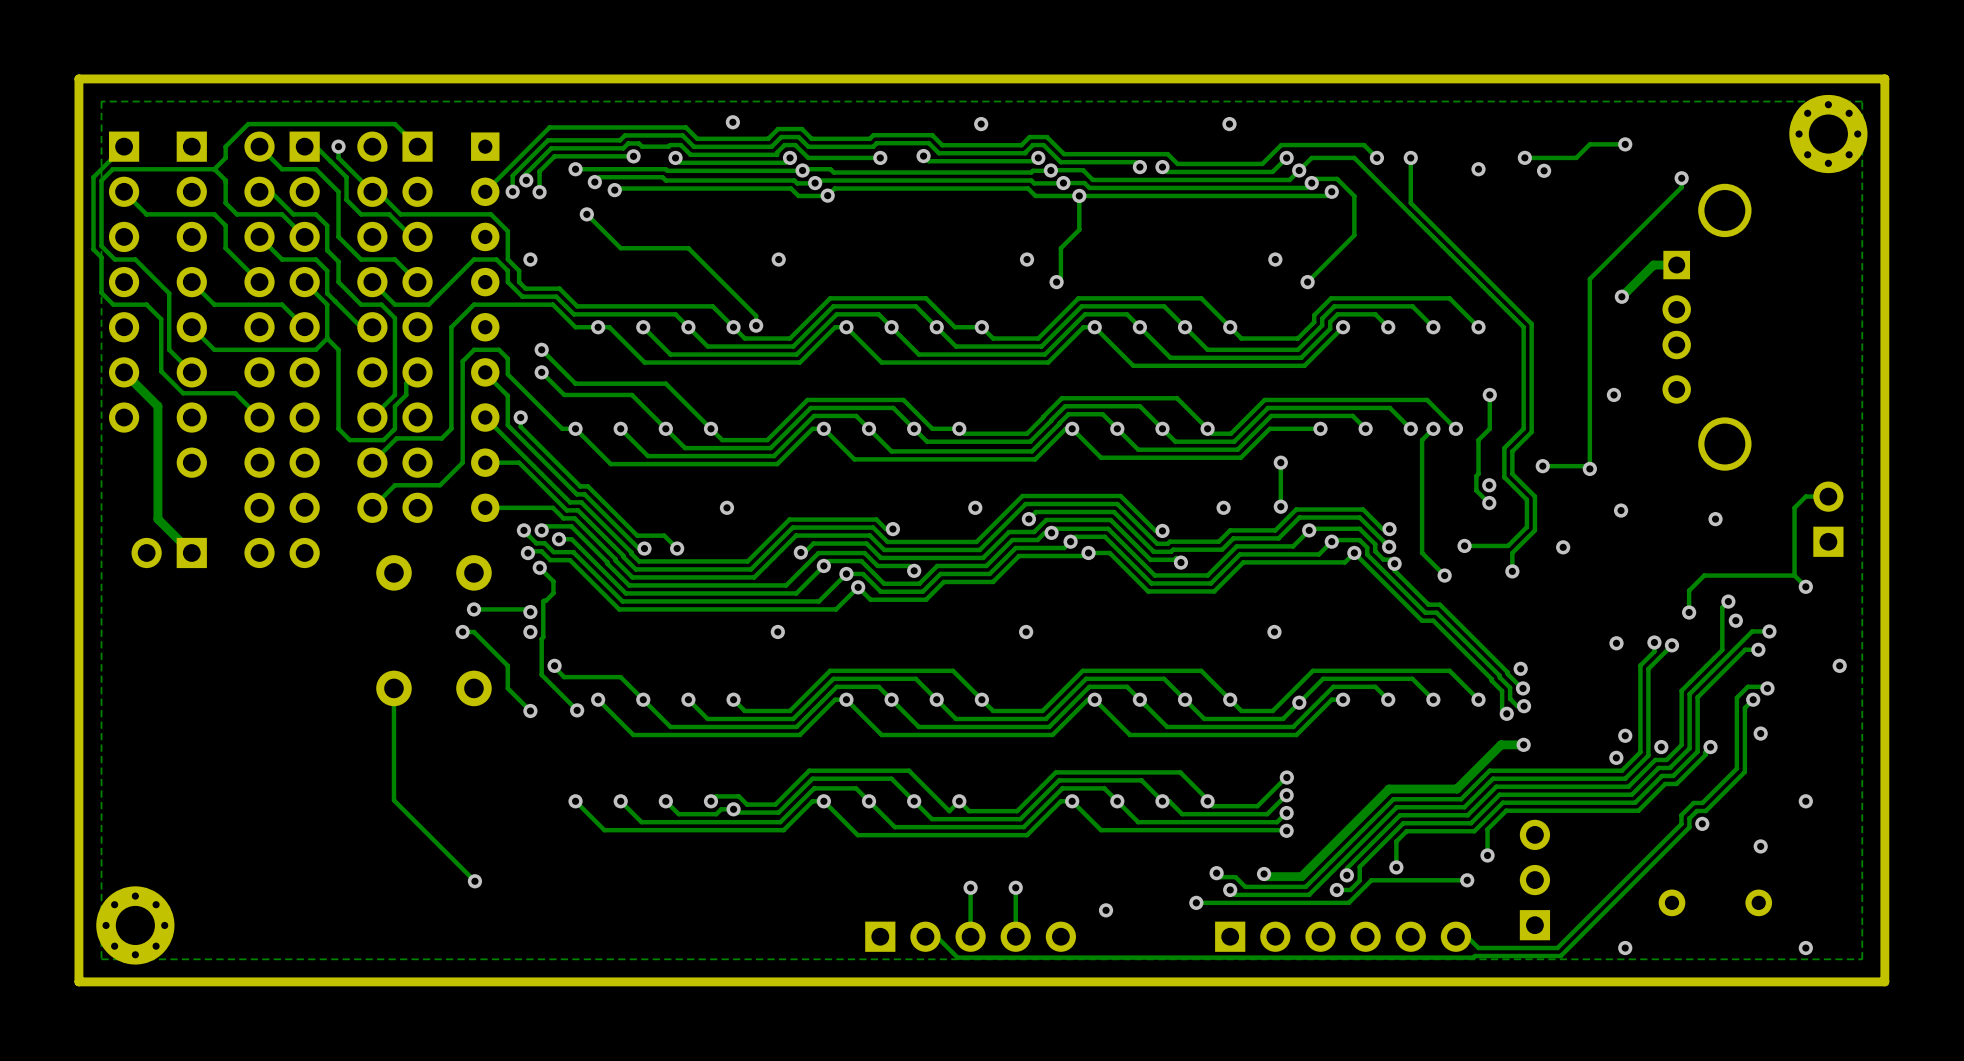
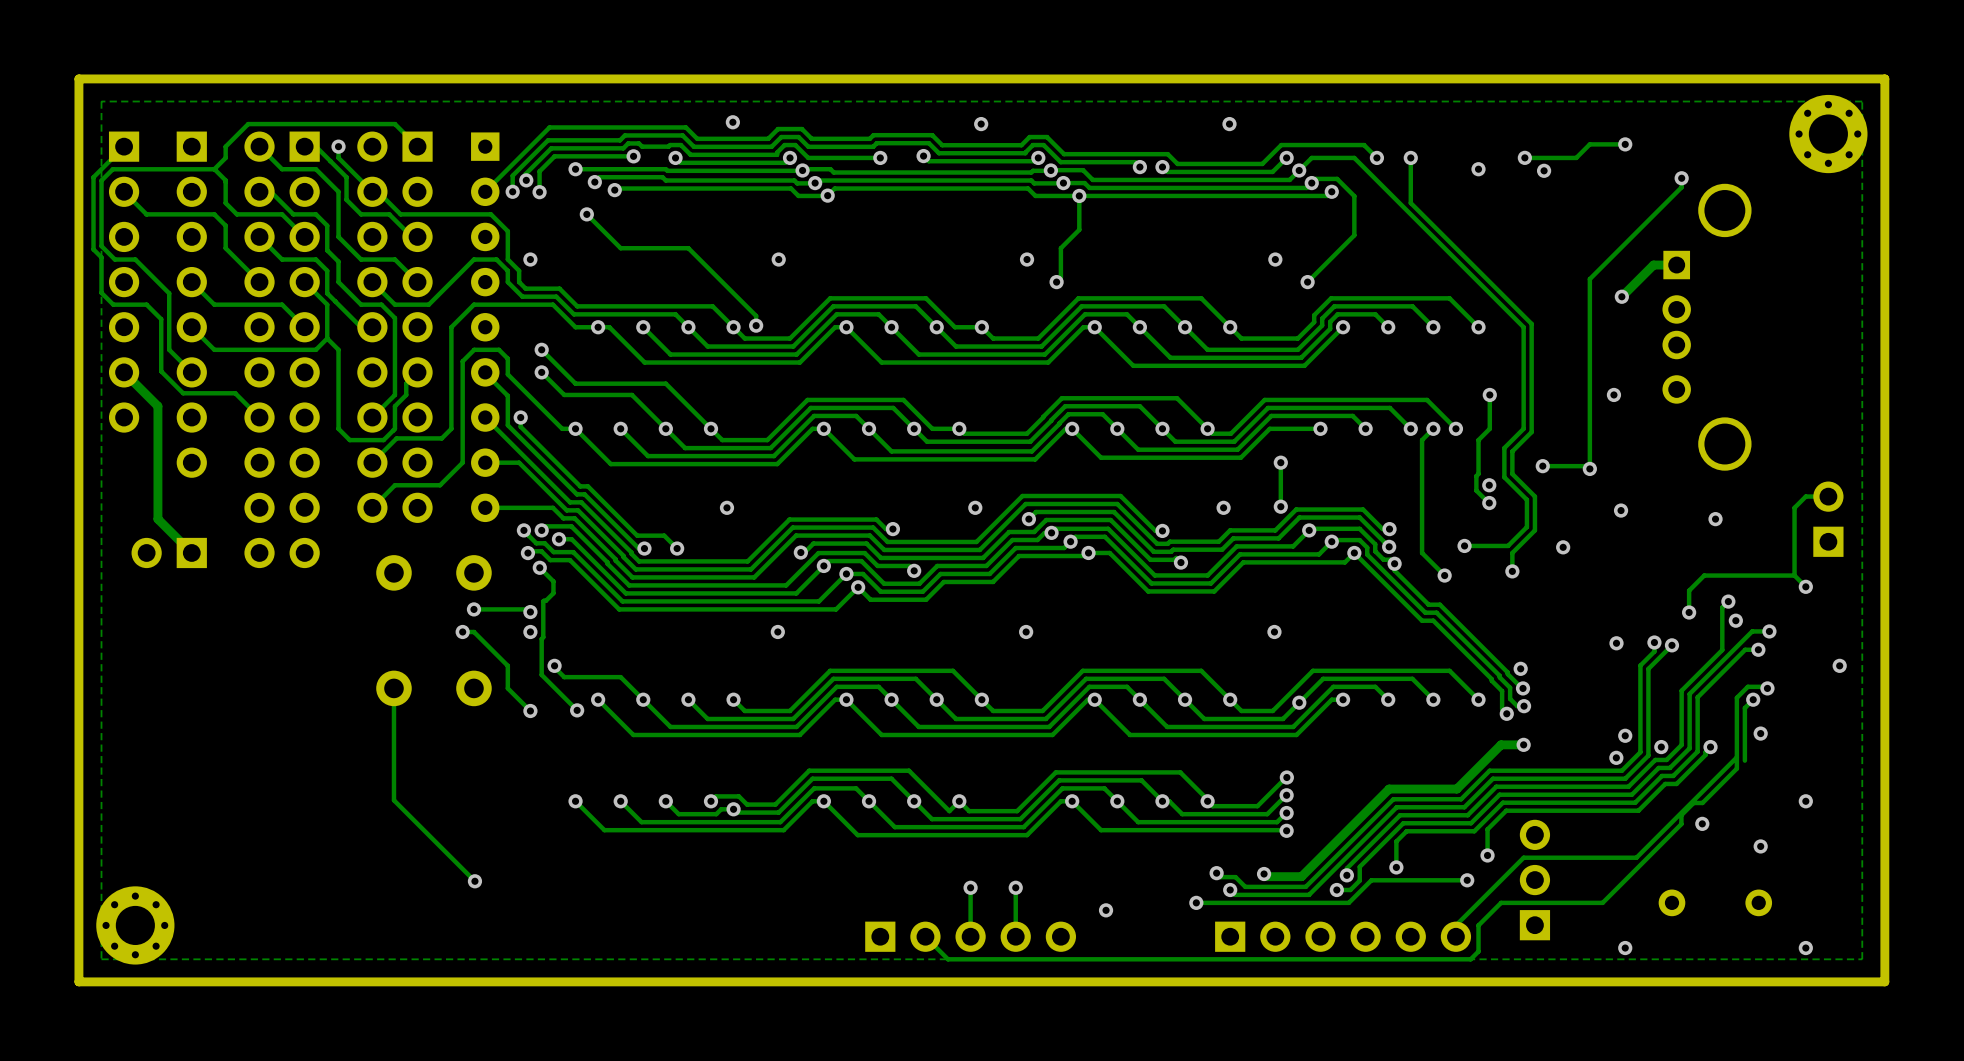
track: (1744, 760) (1744, 771) (1705, 810) (1696, 810) (1689, 818) (1689, 827) (1560, 956) (957, 957) (936, 936) (925, 936) -> (1681, 824) (1602, 902) (1501, 902) (1478, 925) (1478, 951) (1470, 959) (948, 959) (925, 936)
track: (1681, 824) (1557, 948) (1478, 948) (1455, 925) -> (1736, 757) (1636, 857) (1523, 857) (1455, 925)

